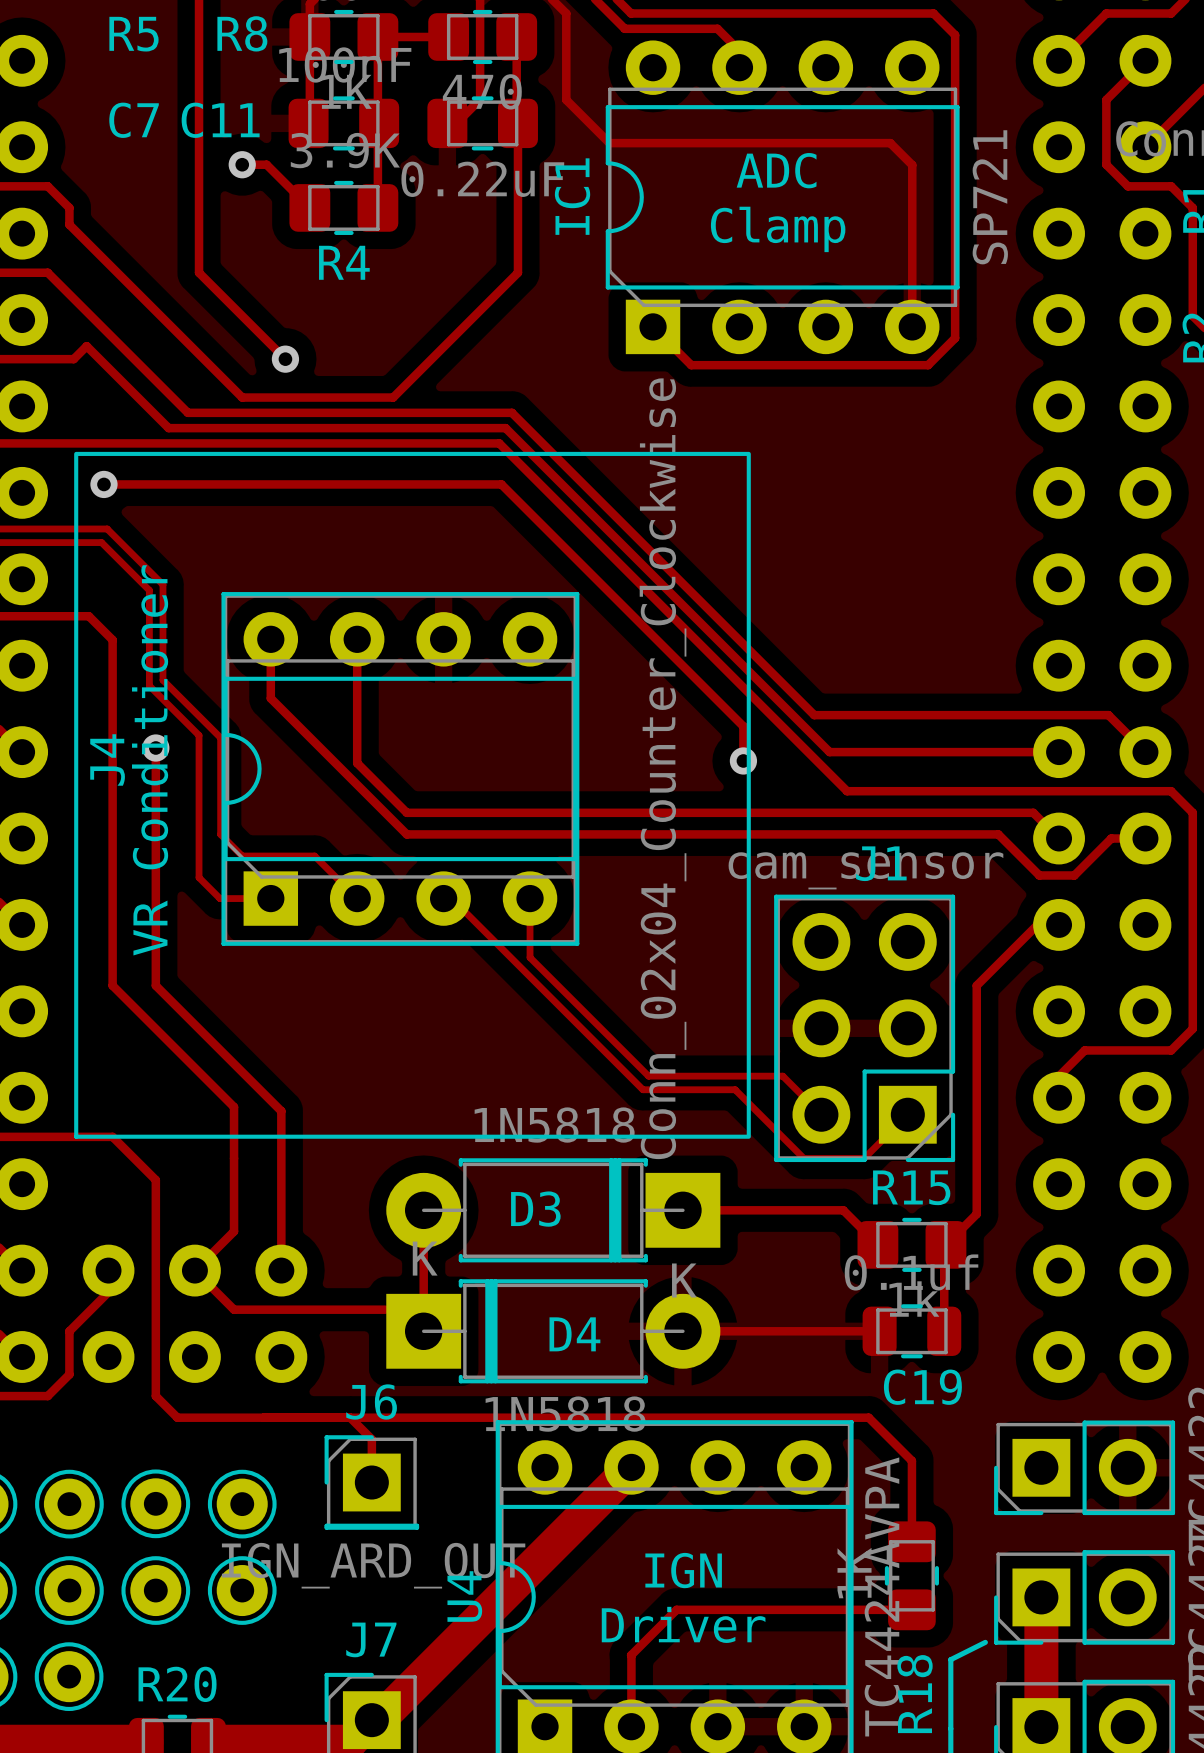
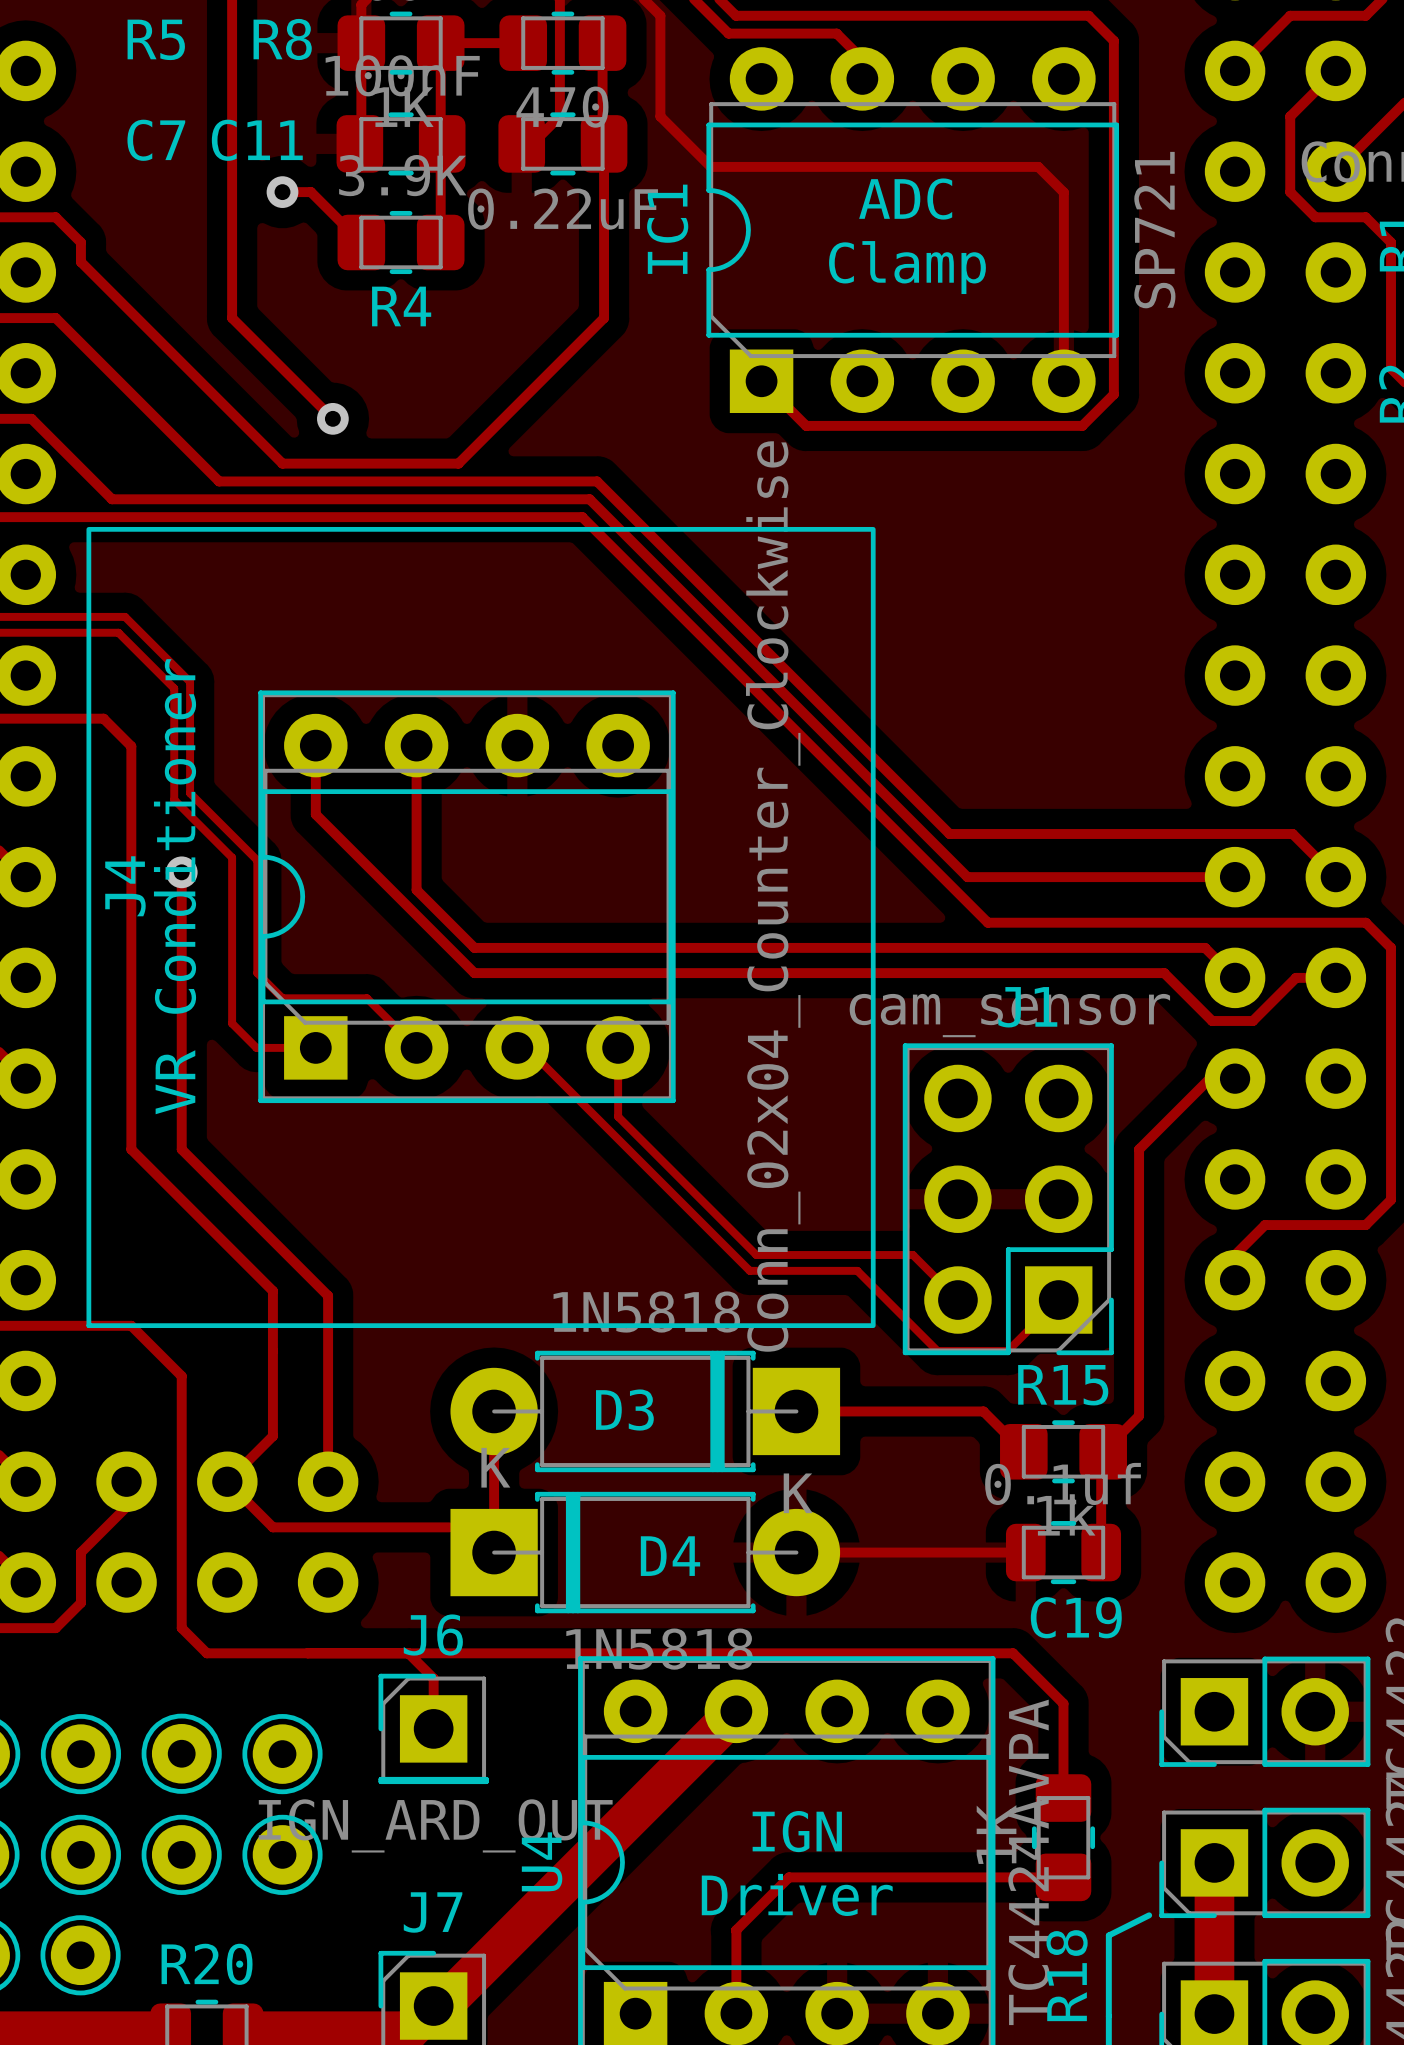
track: (27, 359) (73, 359) (86, 346) (168, 428) -> (31, 418) (112, 499) (196, 499)
track: (103, 484) (501, 484) (743, 726) (743, 760) -> none
via: (103, 484) -> none
via: (743, 760) -> none

